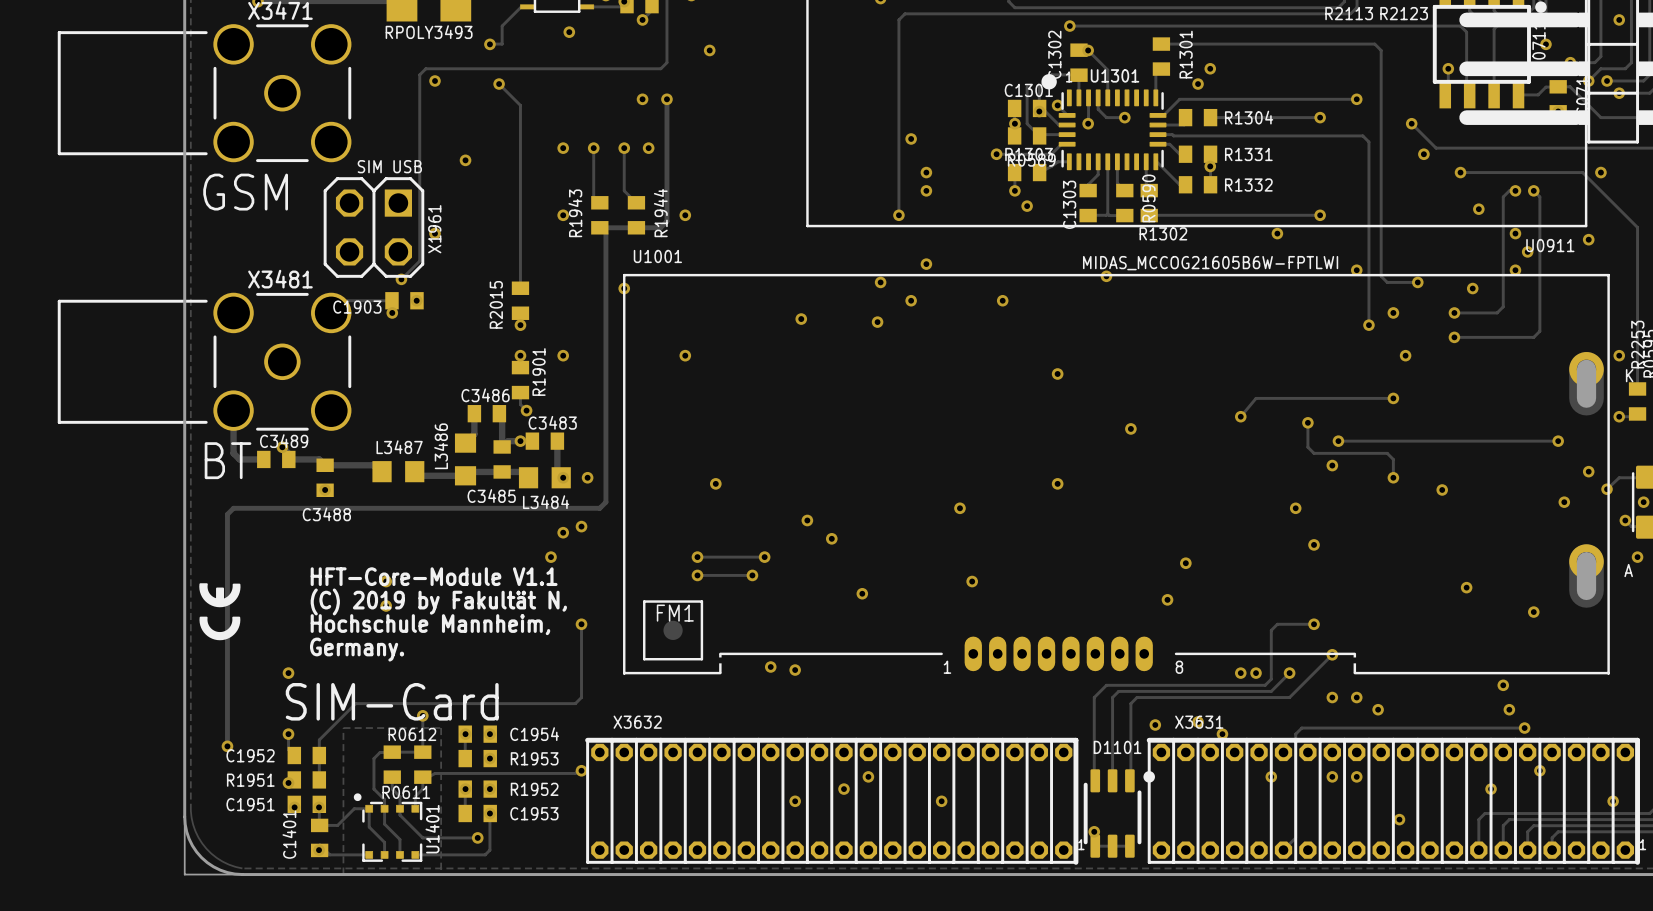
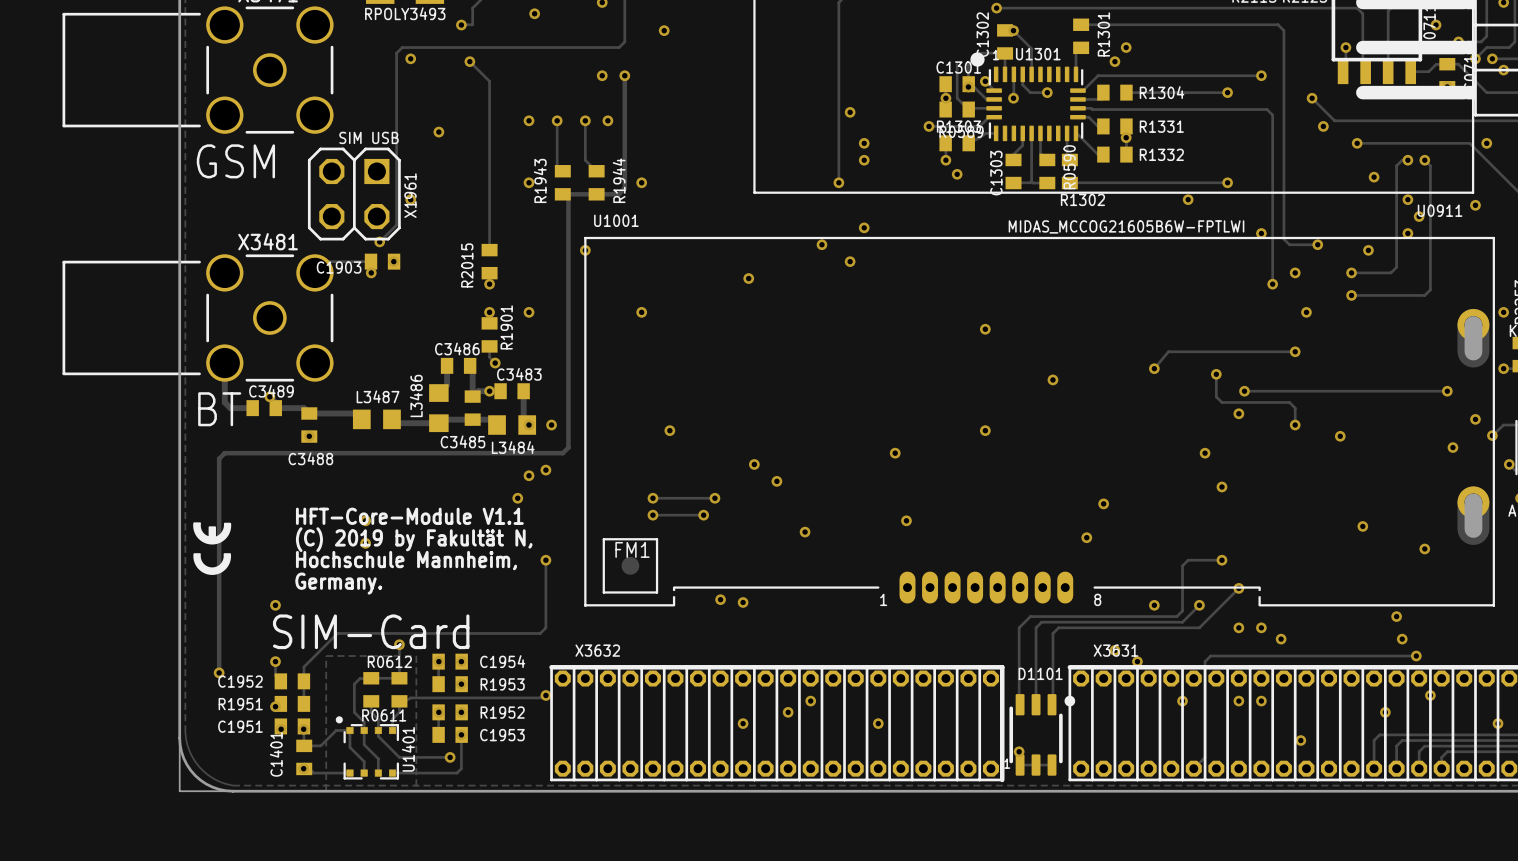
via: (1106, 276) -> none
via: (1002, 300) -> none
via: (877, 322) -> none
via: (1256, 673) -> none
via: (1155, 724) -> none

